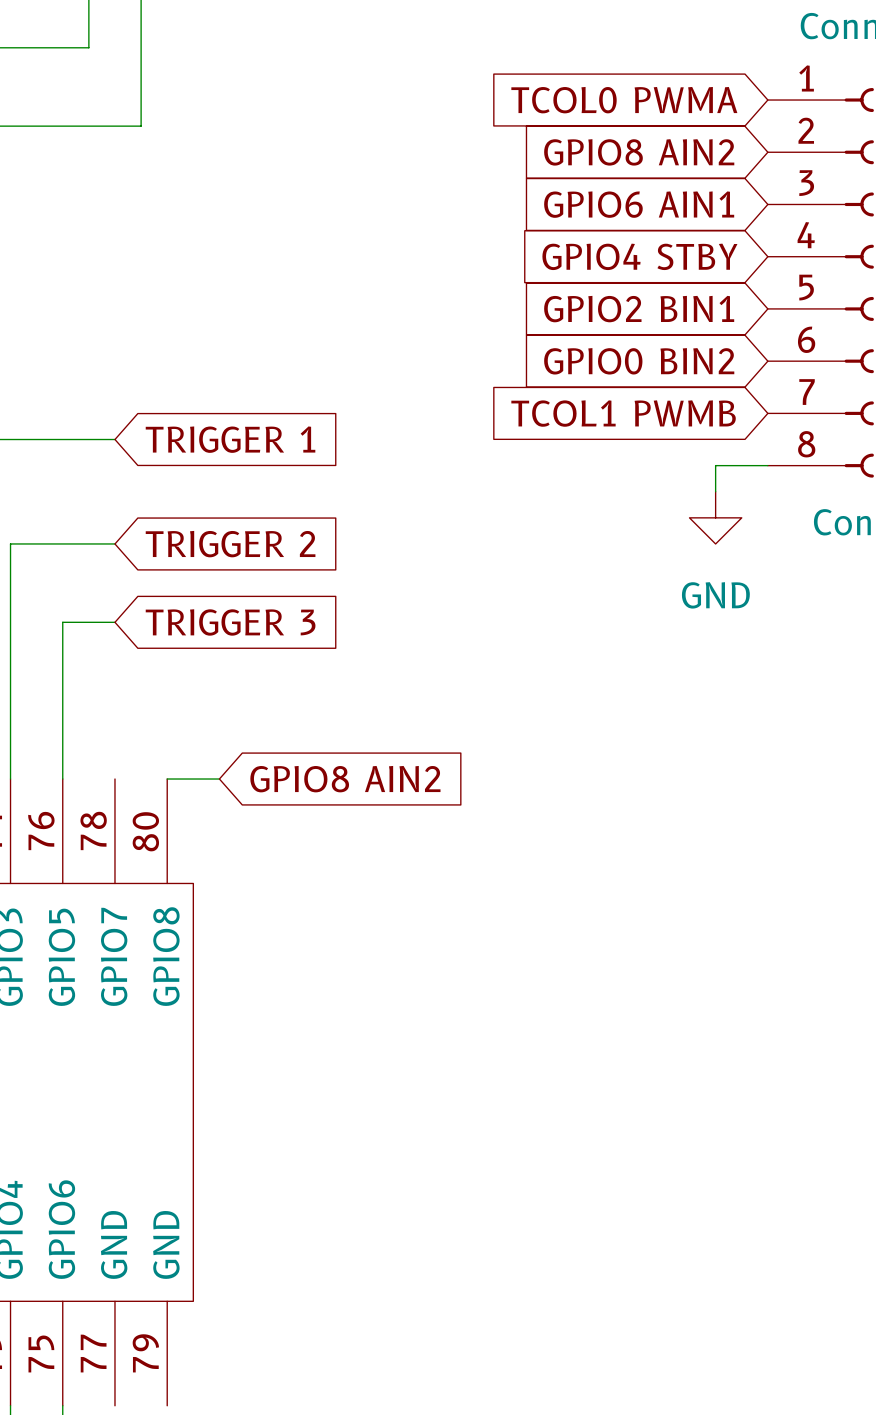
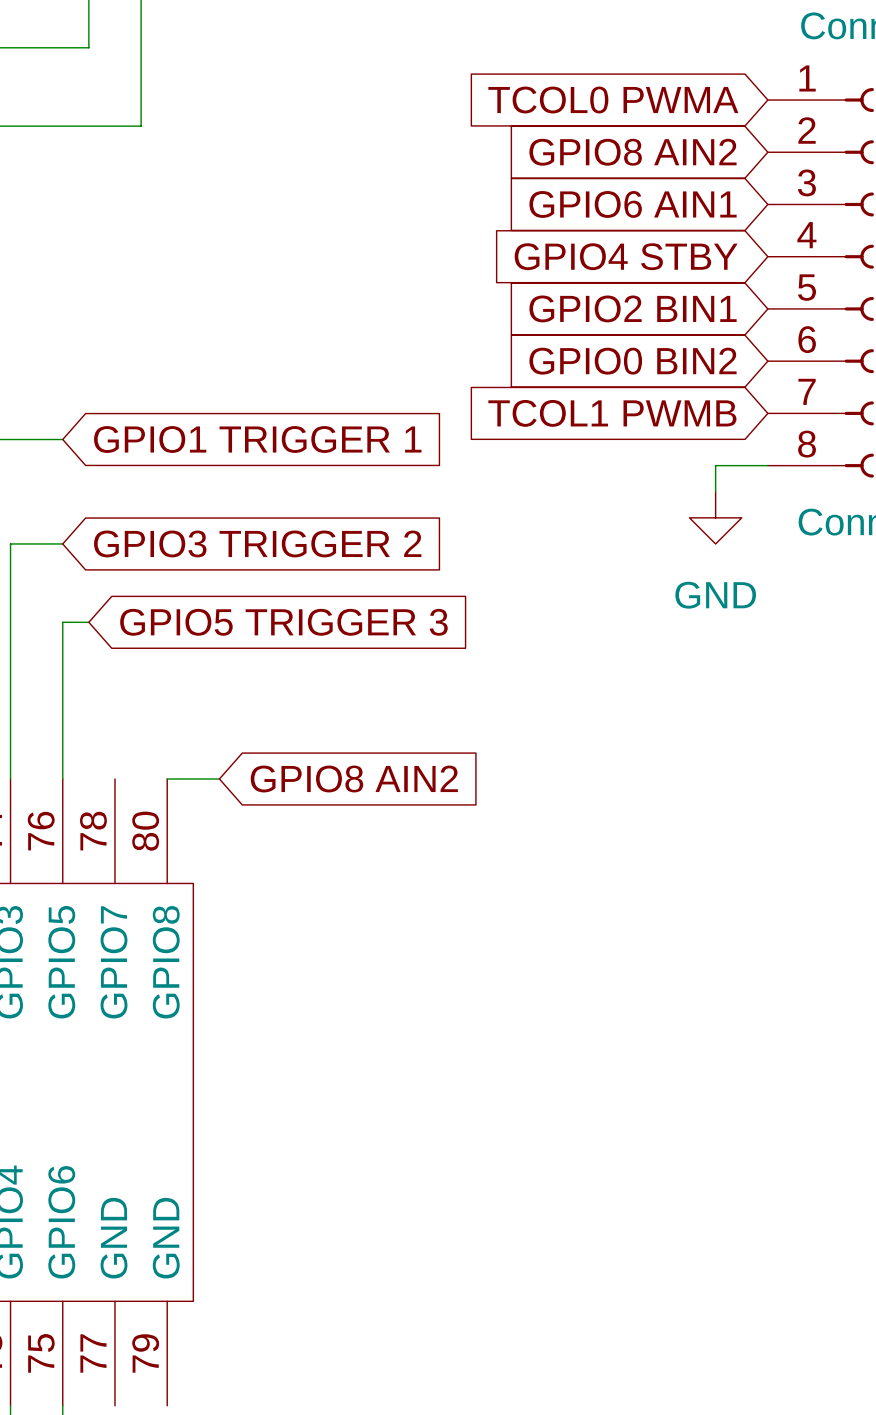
wire: (62, 439) (114, 439) -> none
global label: TRIGGER 1 (230, 439) -> GPIO1 TRIGGER 1 (257, 439)
wire: (62, 543) (114, 543) -> none
global label: TRIGGER 2 (230, 544) -> GPIO3 TRIGGER 2 (257, 543)
wire: (88, 622) (114, 622) -> none
global label: TRIGGER 3 (230, 622) -> GPIO5 TRIGGER 3 (283, 622)

